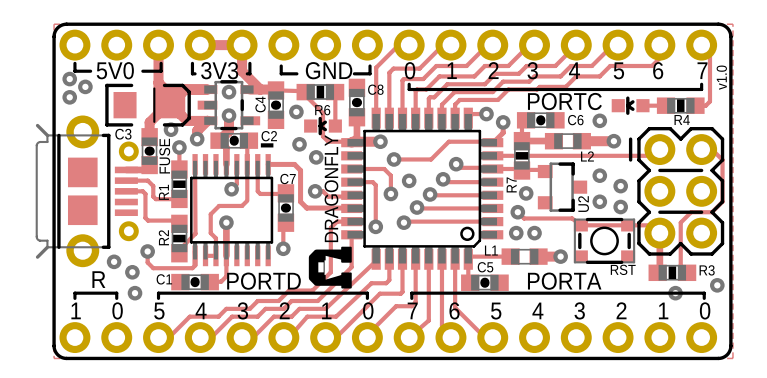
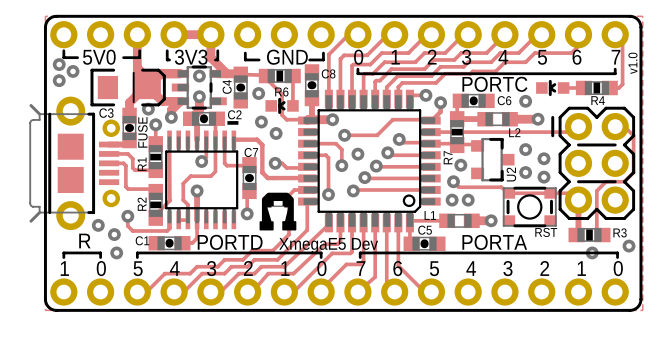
text: DRAGONFLY (331, 188) -> none
drawing: none -> [259, 192, 297, 231]
drawing: [308, 246, 352, 289] -> none
text: none -> XmegaE5 Dev (328, 245)

